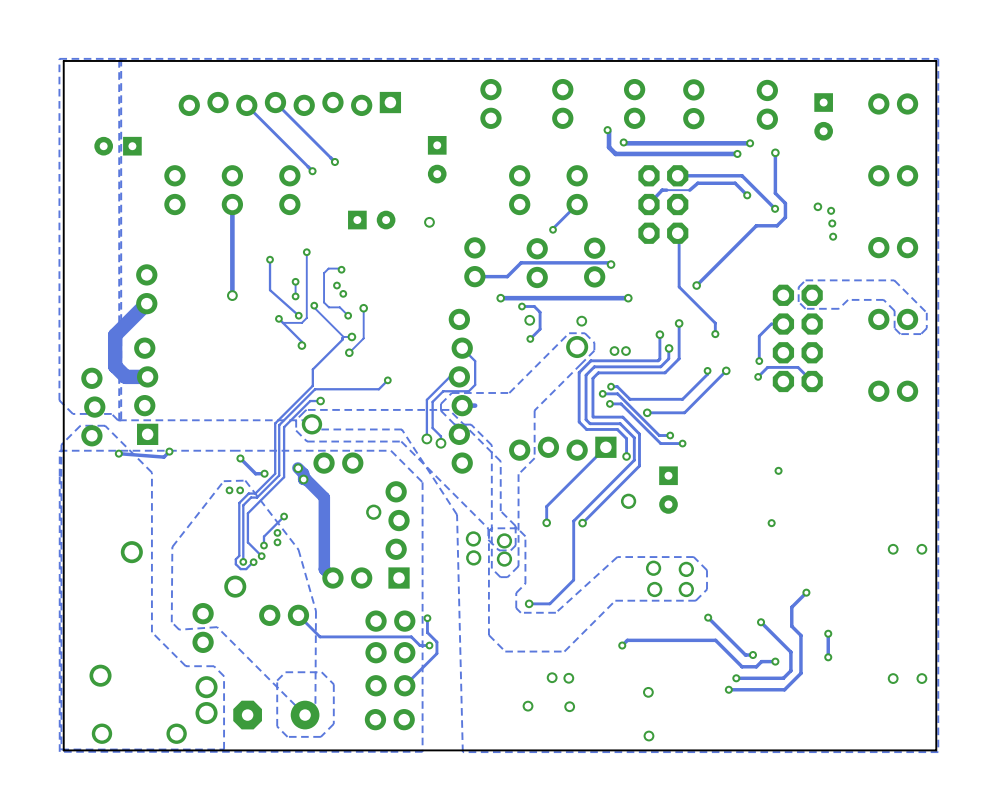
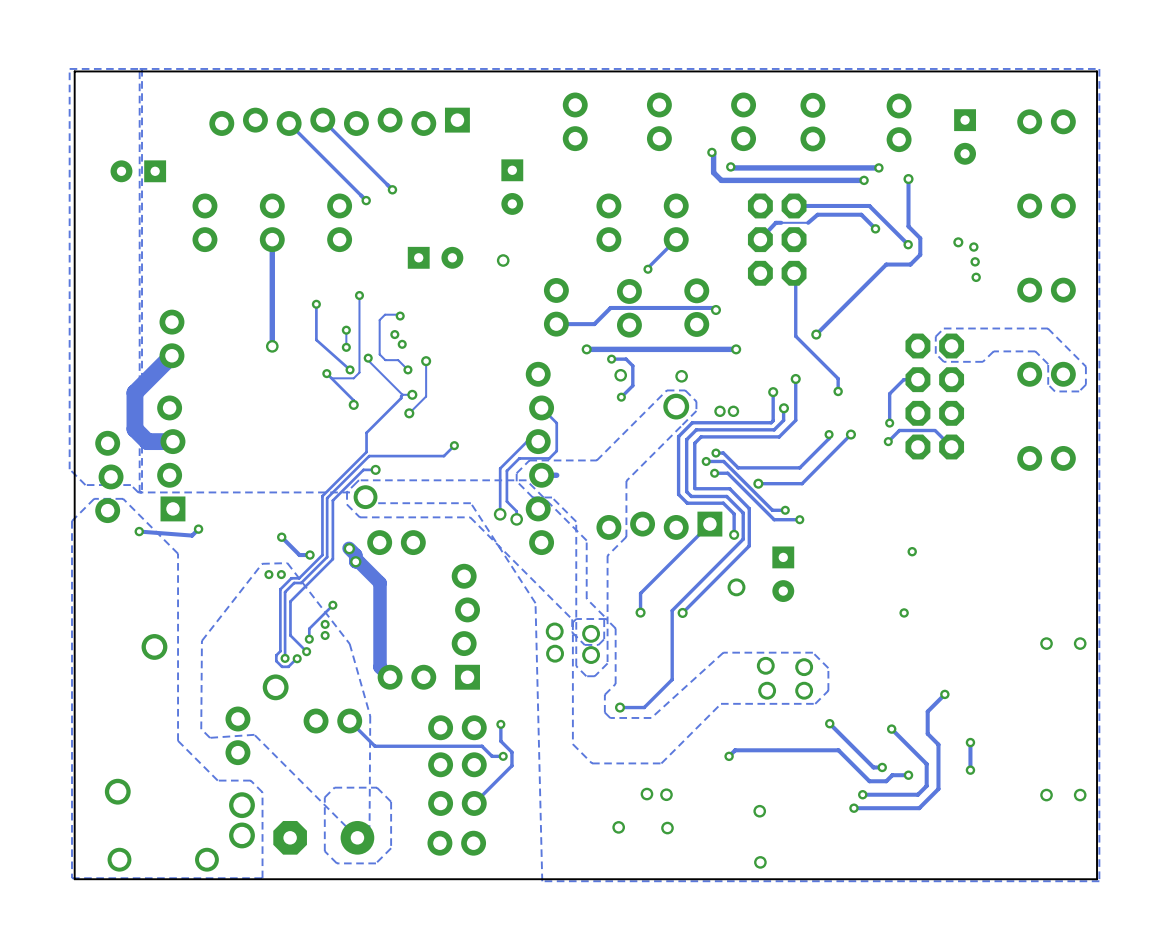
zone outline: (390, 450) (59, 450) (59, 751) (422, 751) (422, 482) (390, 450) -> none
via: (373, 512) -> none

